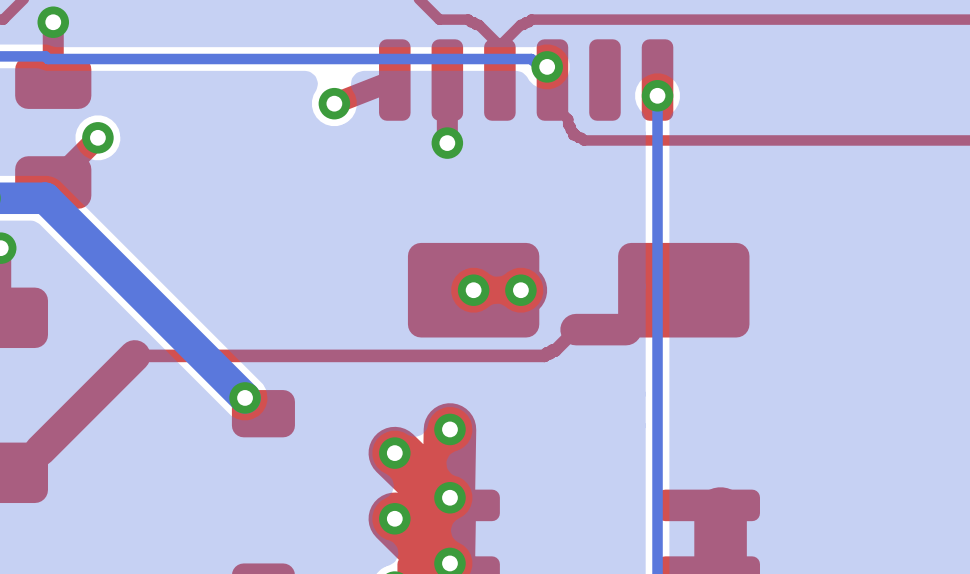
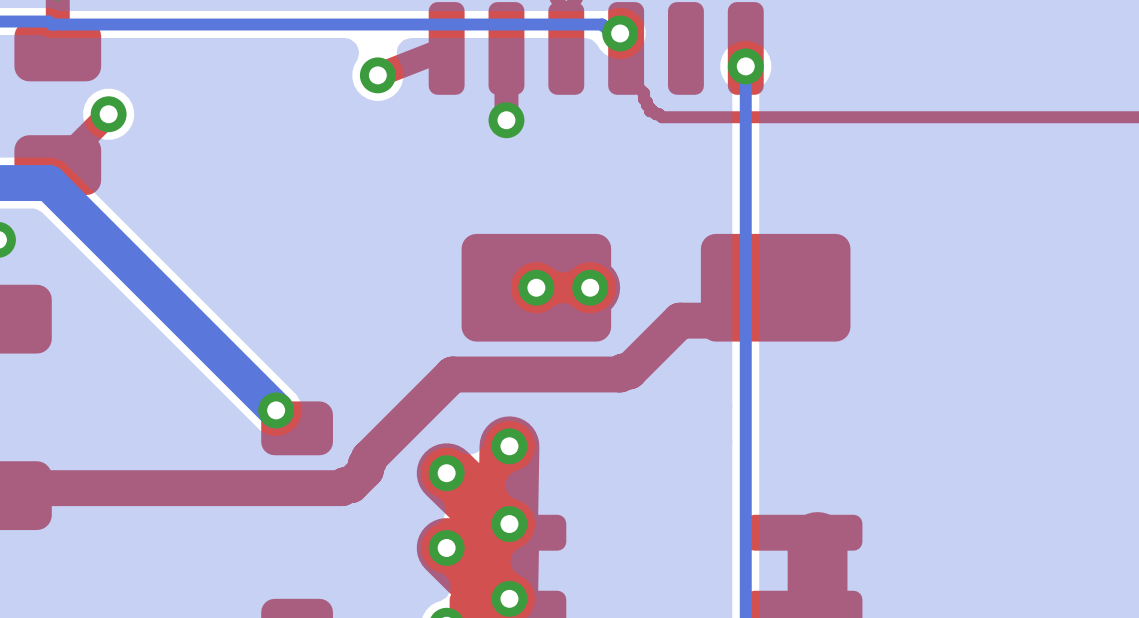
top track: none -> (721, 320) (679, 320) (629, 371) (623, 371) (620, 374) (452, 374) (368, 458) (365, 470) (350, 485) (344, 485) (341, 488) (30, 488)
top track: (626, 329) (576, 329) (555, 350) (544, 355) (134, 355) (40, 450) -> none

